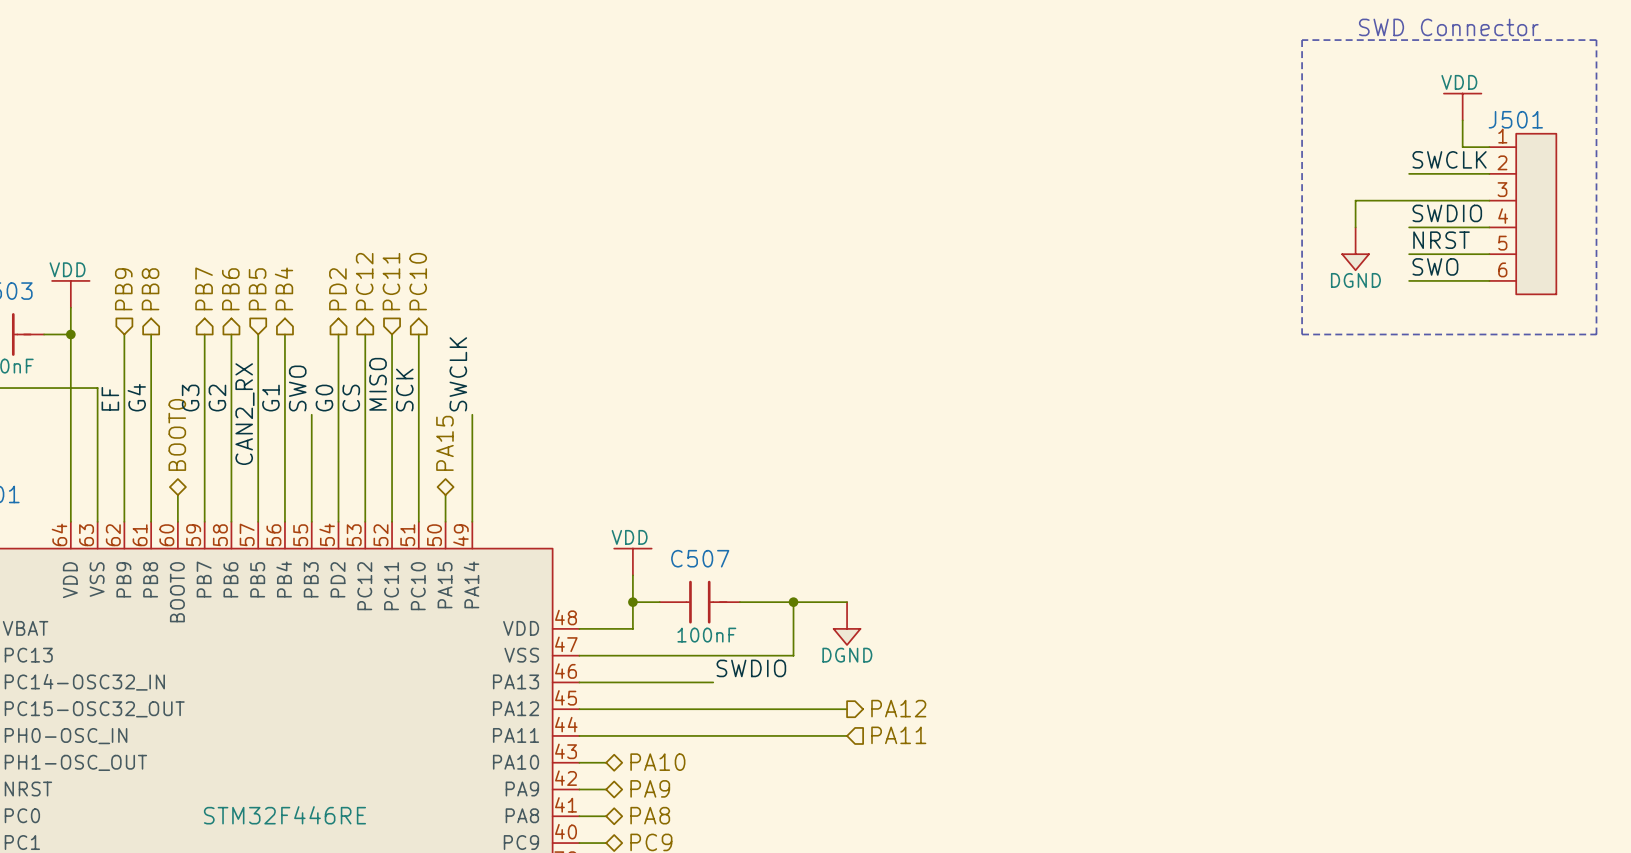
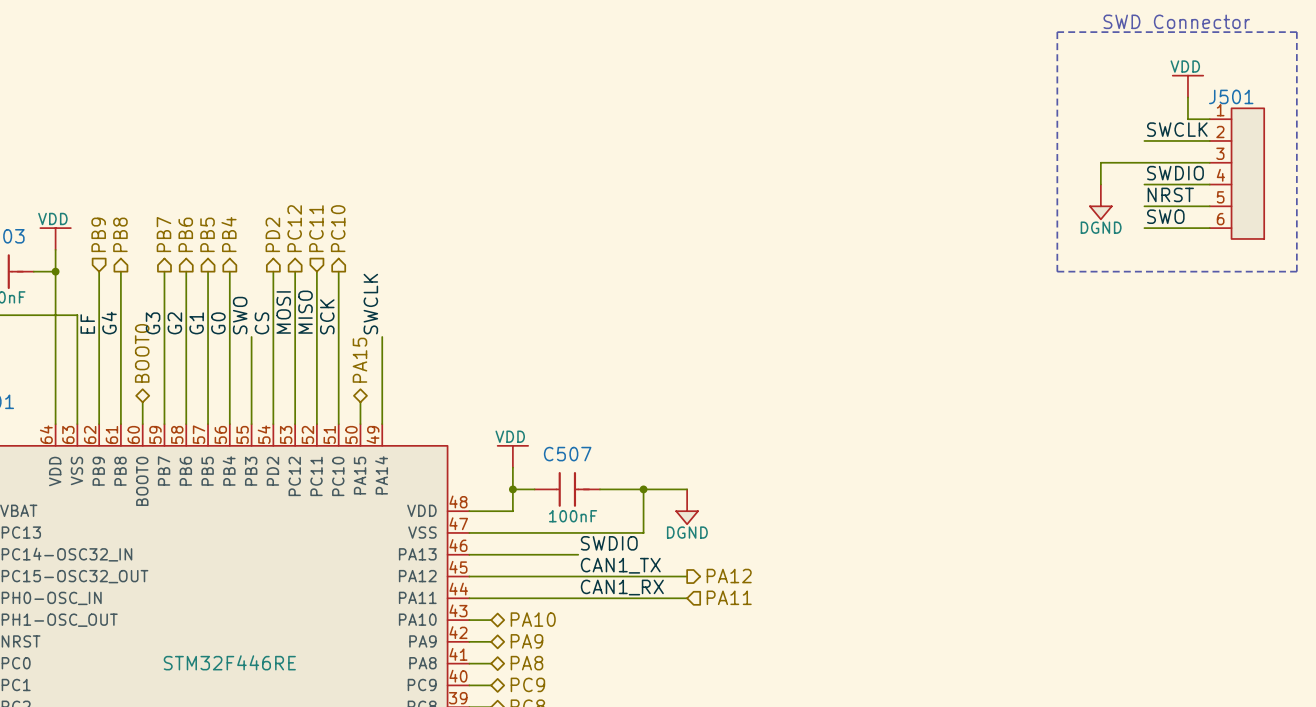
hierarchical label shape: input (257, 289) -> output (207, 234)
label: none -> G1 (196, 323)
label: G1 (270, 398) -> G0 (218, 323)
label: G0 (324, 398) -> CS (261, 323)
label: CS (351, 398) -> MOSI (283, 312)
label: CAN2_RX (244, 414) -> none
label: none -> CAN1_TX (620, 565)
label: none -> CAN1_RX (622, 587)

